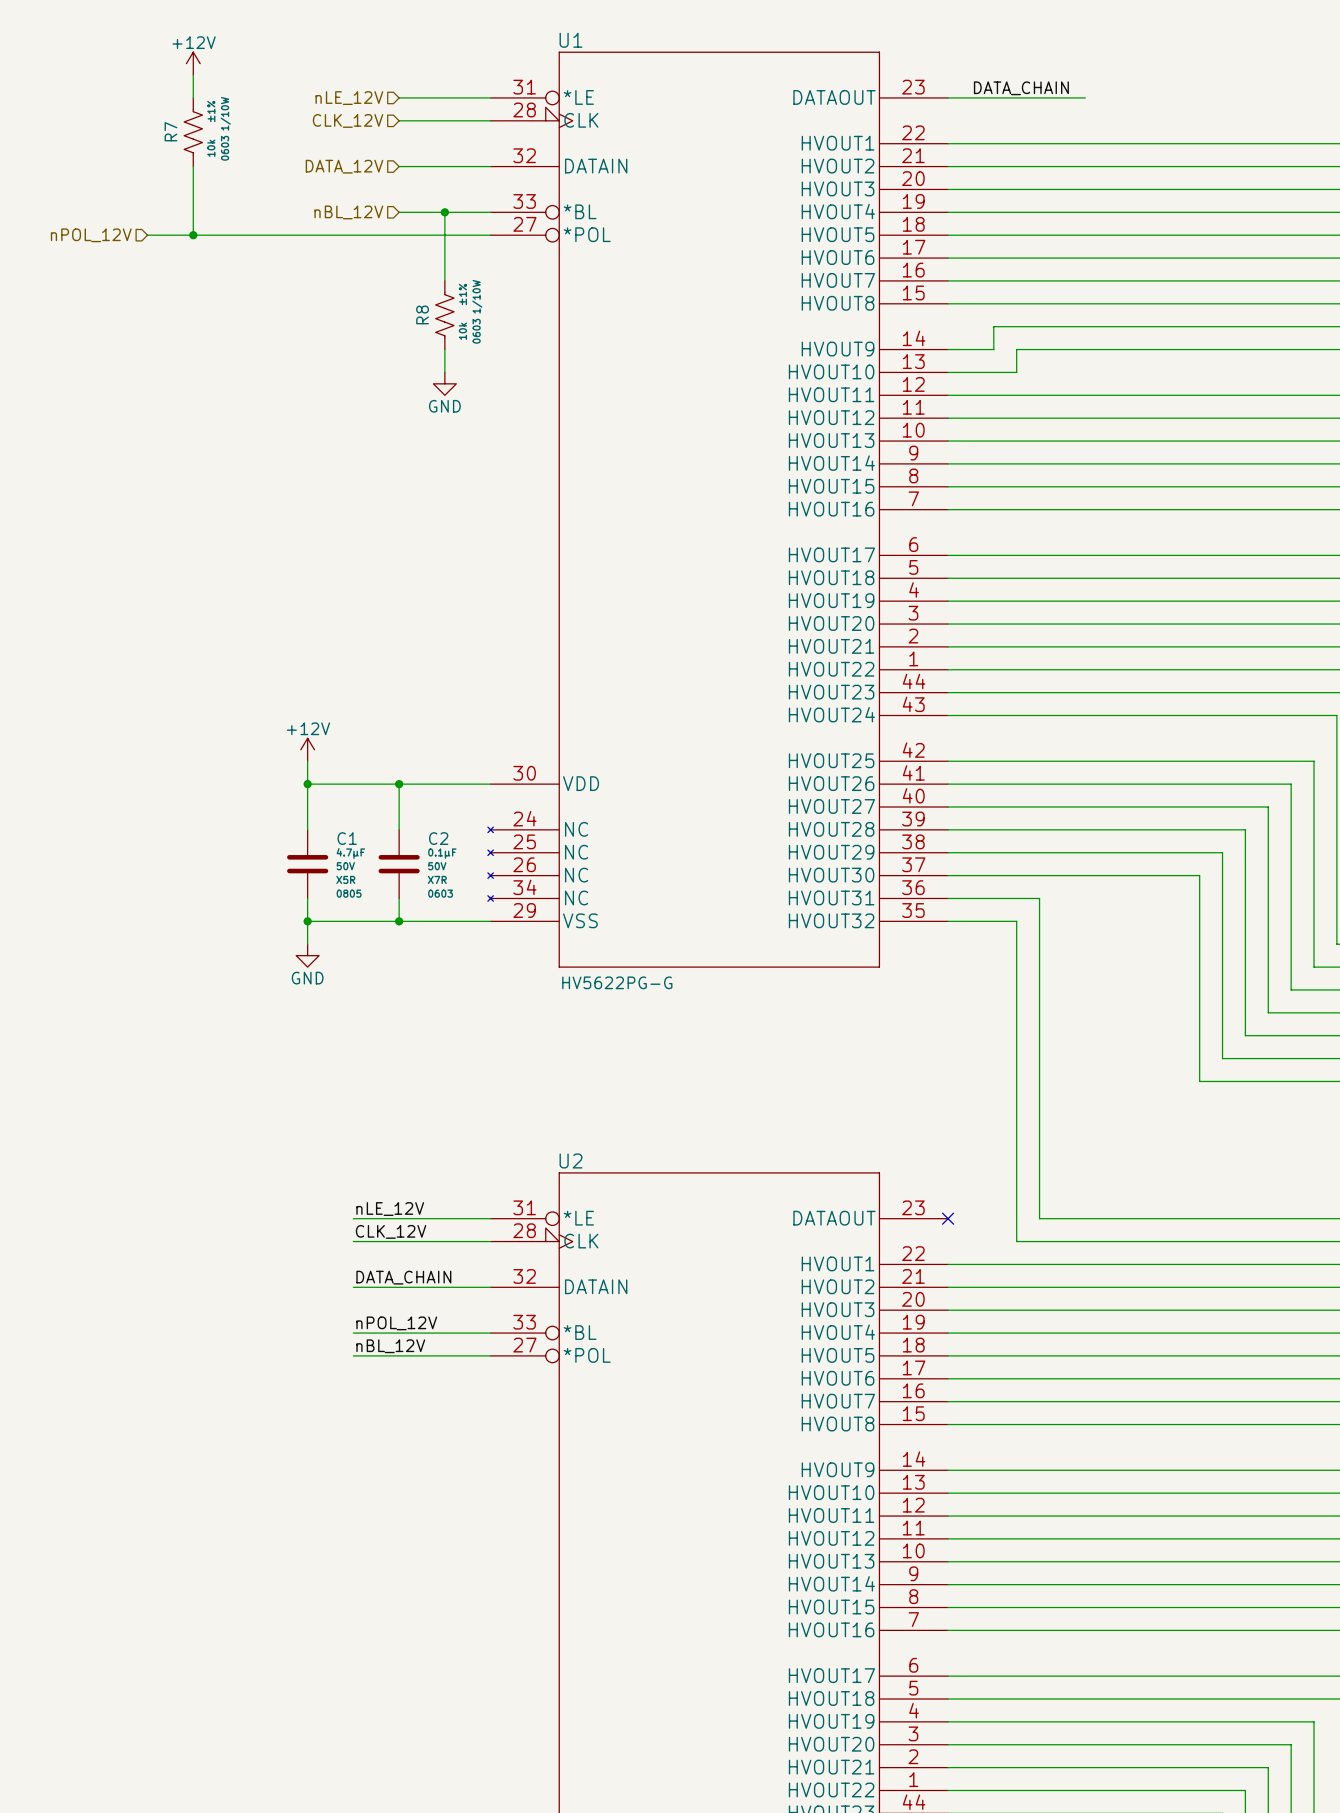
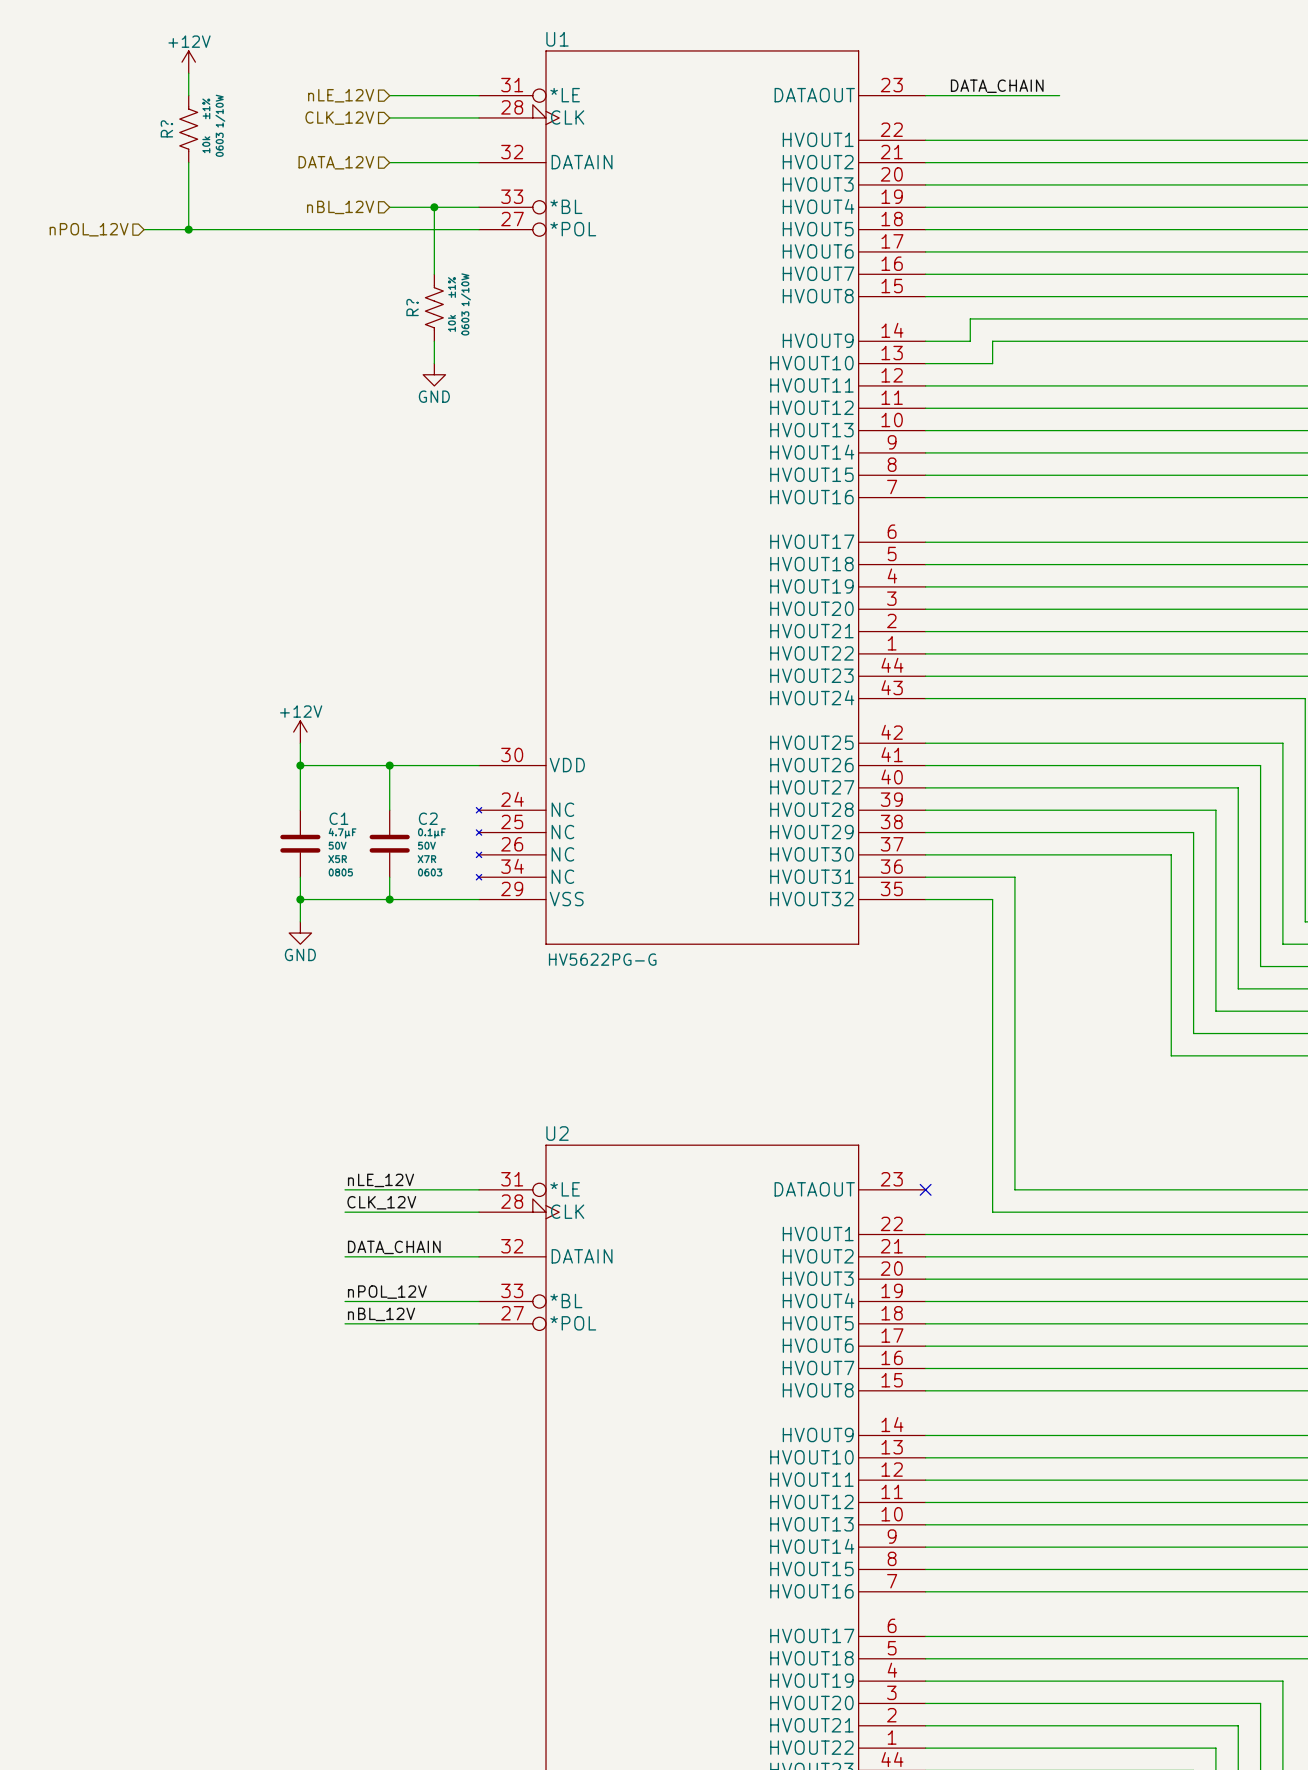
R7 name: R7 (170, 131) -> R? (166, 128)
R8 name: R8 (422, 314) -> R? (412, 307)

